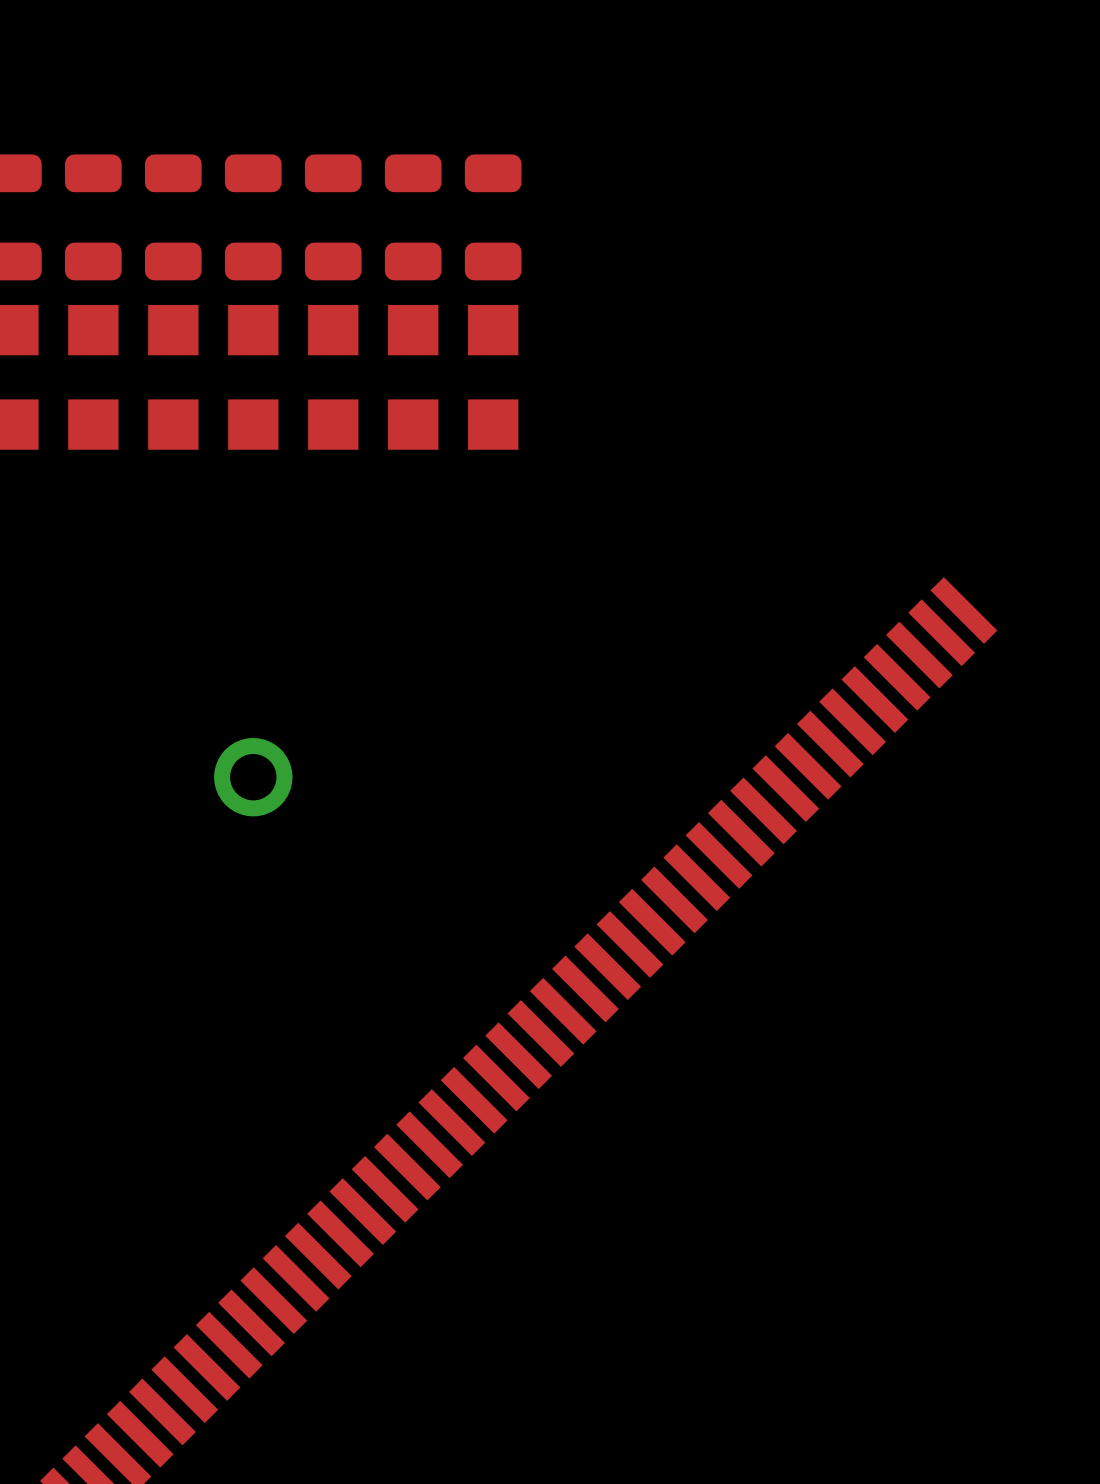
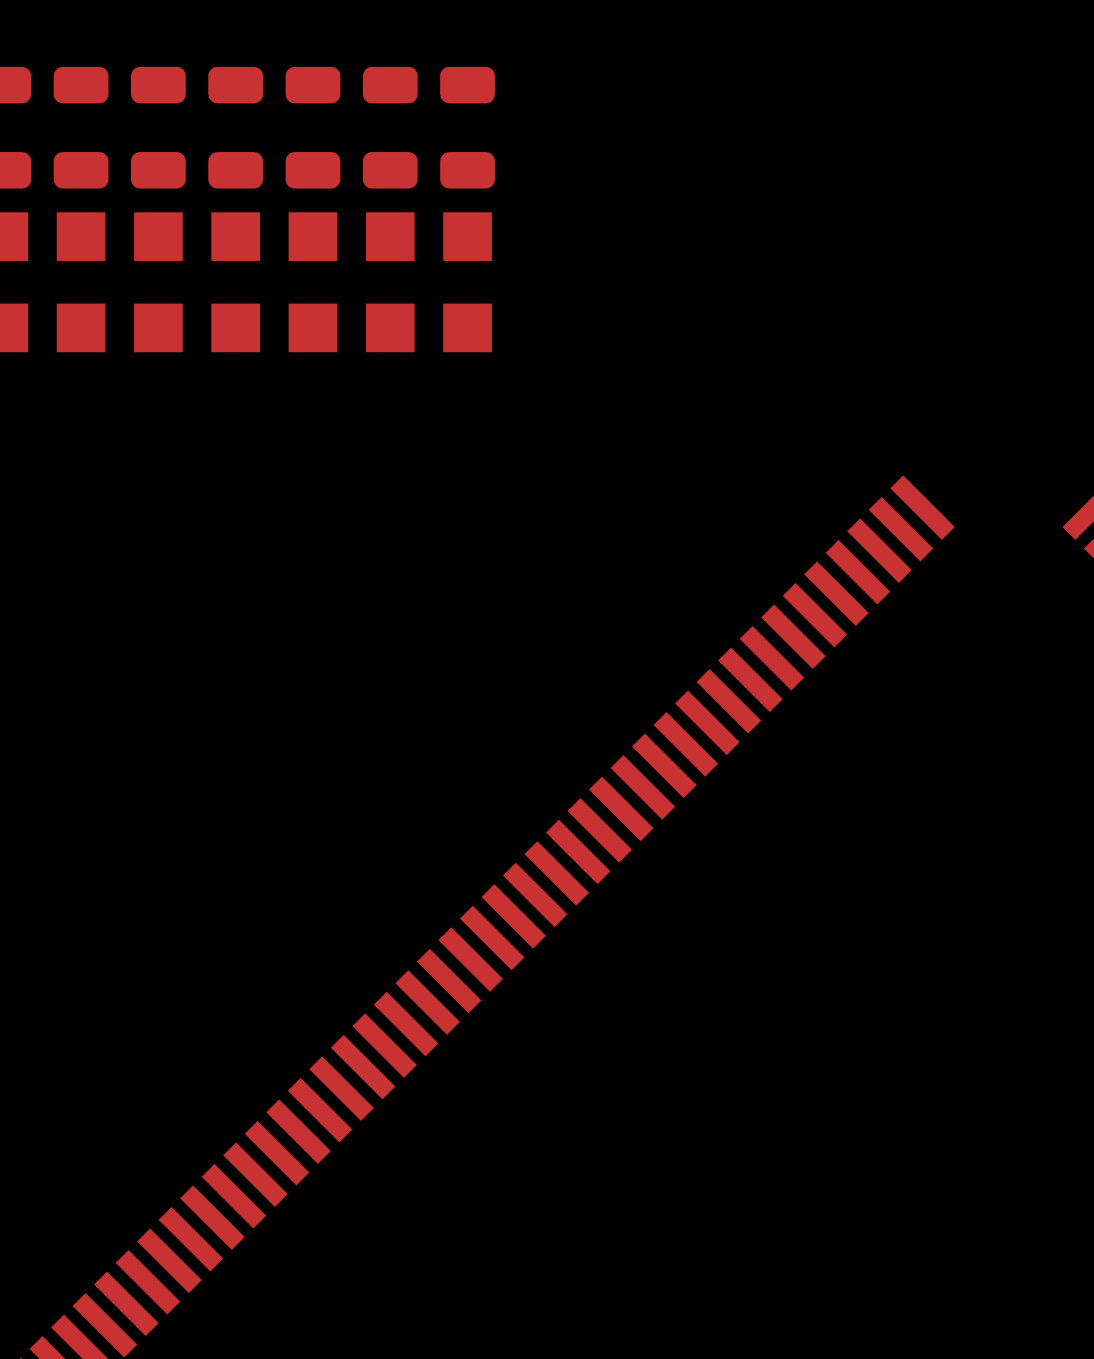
part: (253, 777) -> none

